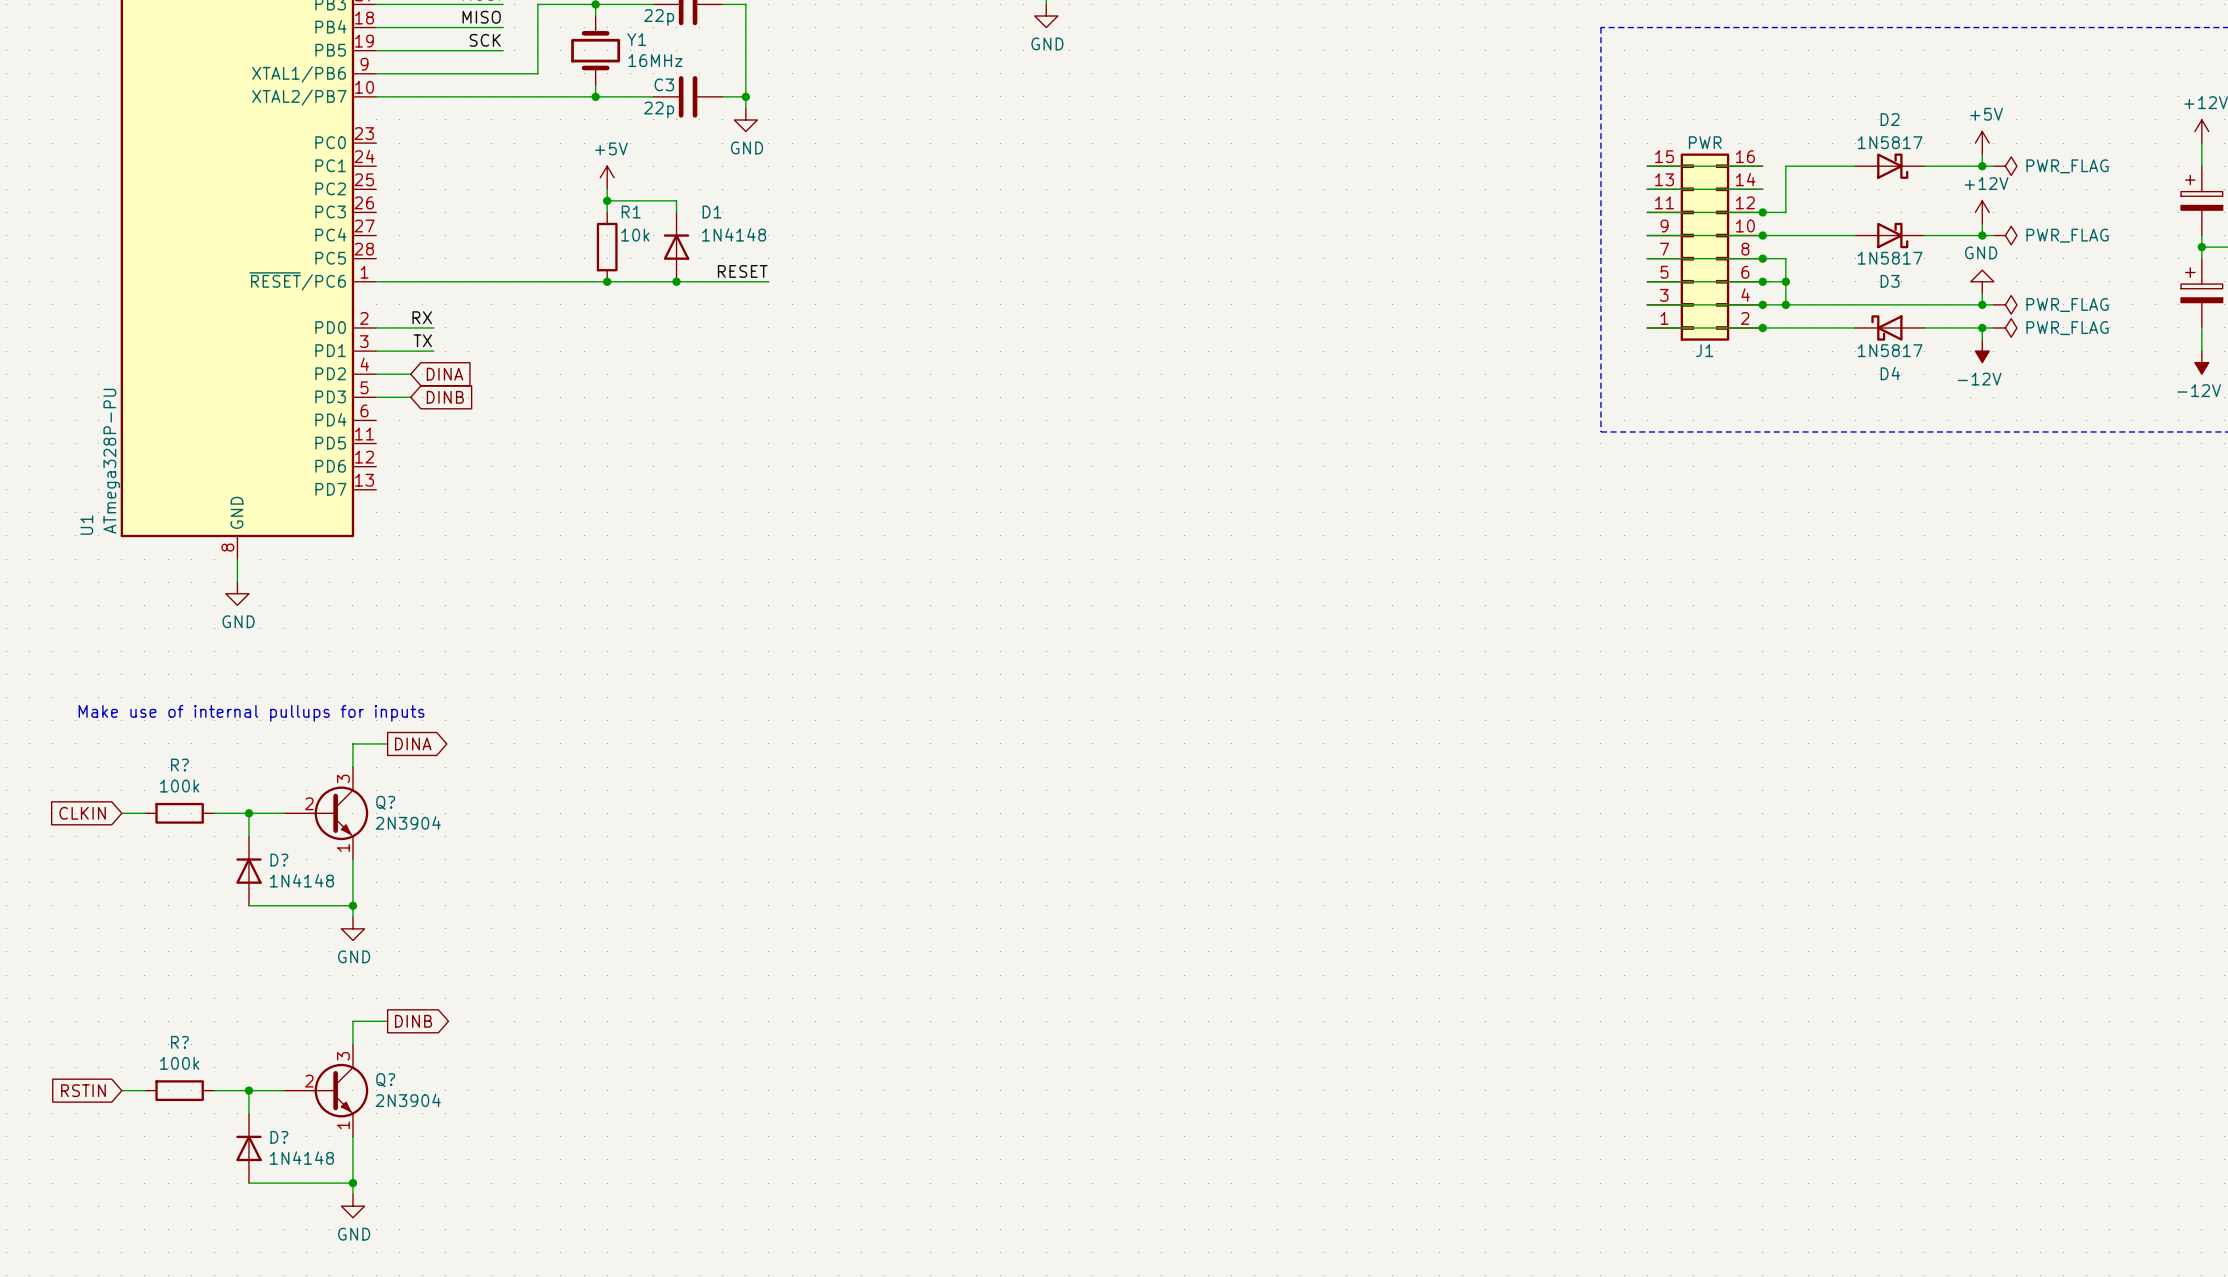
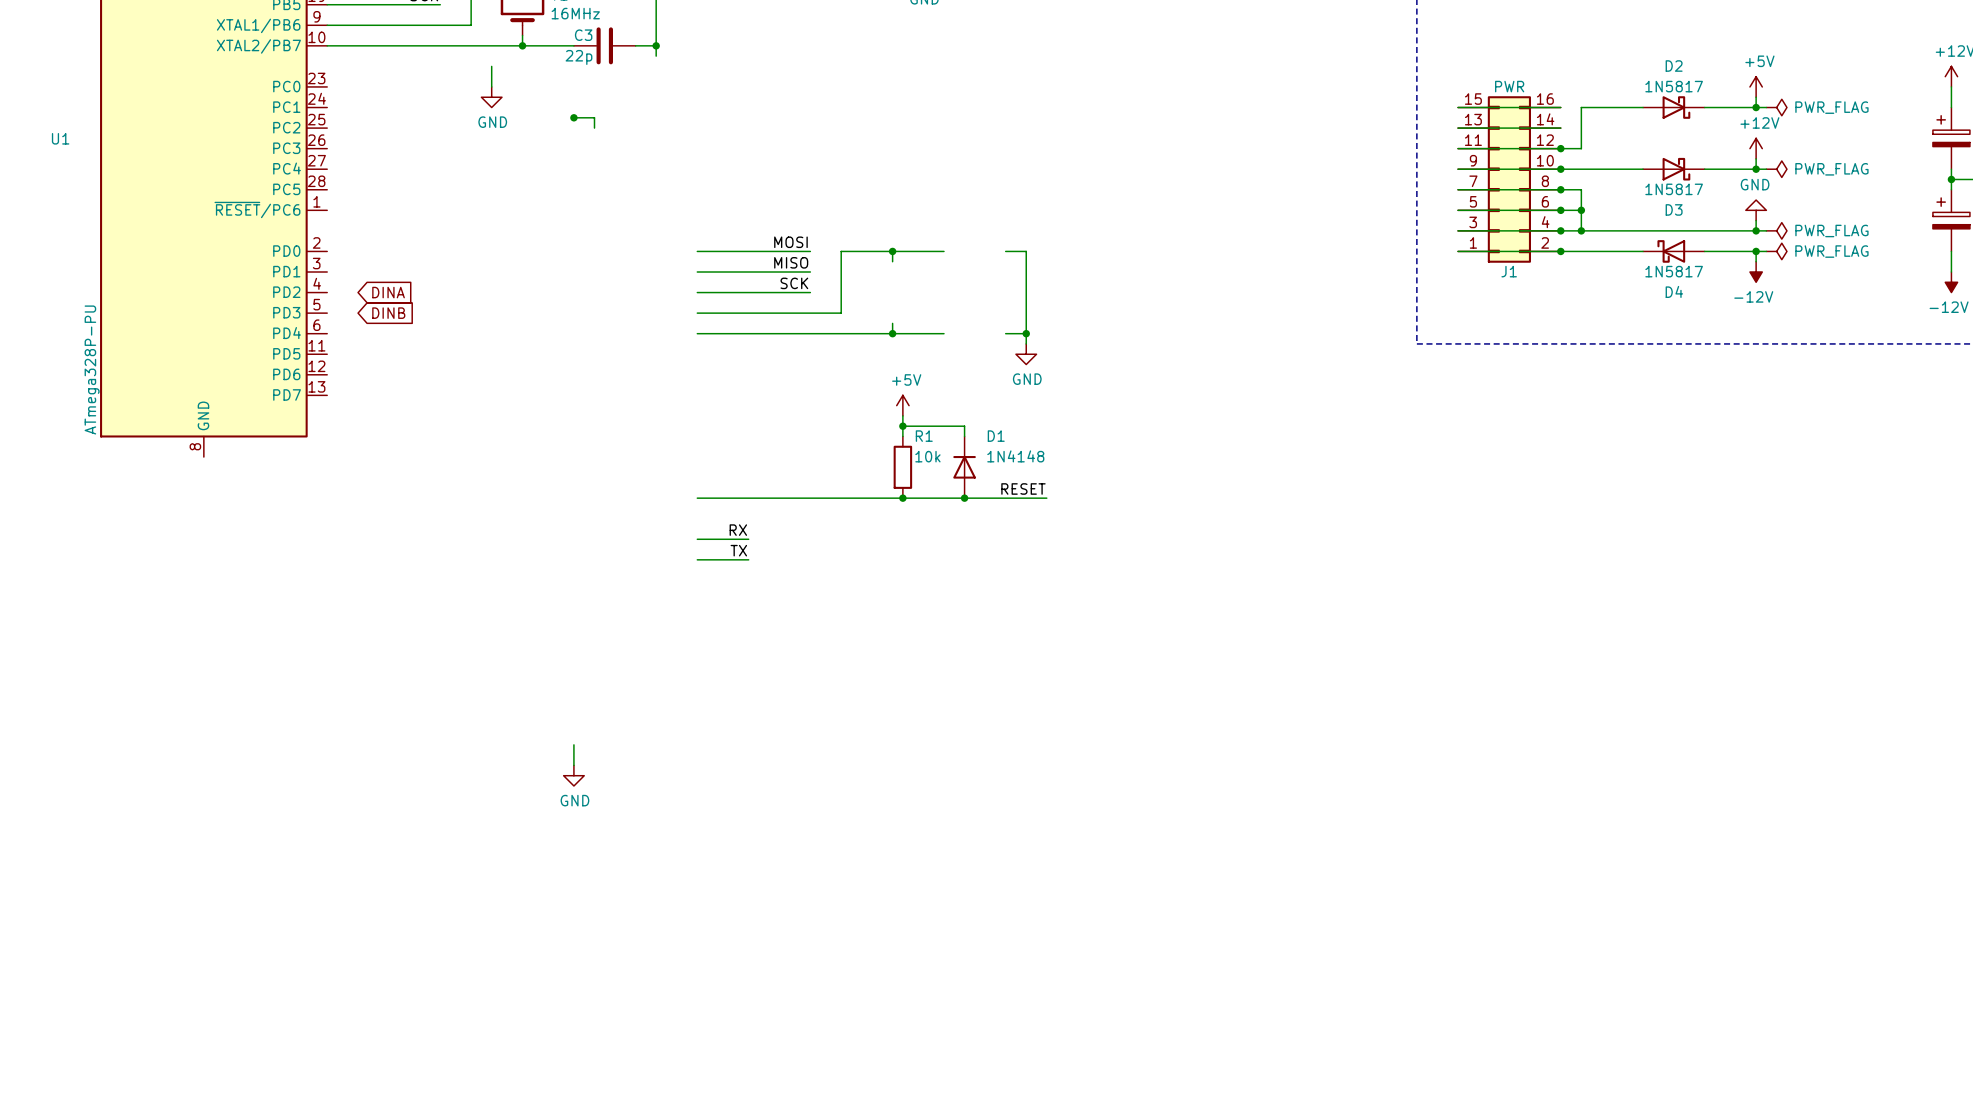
power symbol: GND (745, 119) -> none
power symbol: none -> GND (491, 97)
power symbol: +5V (607, 177) -> none
wire: none -> (573, 117) (594, 117) (594, 128)
wire: (607, 189) (607, 212) -> (491, 66) (491, 86)
wire: (607, 200) (676, 200) (676, 212) -> none
junction position: (607, 200) -> (573, 117)
R1 position: (607, 247) -> (902, 467)
D1 position: (676, 247) -> (964, 467)
label: RESET (742, 271) -> none
wire: (376, 281) (768, 281) -> none
junction: (607, 281) -> none
junction: (676, 281) -> none
label: RX (422, 317) -> none
label: none -> MOSI (790, 242)
wire: (376, 327) (433, 327) -> none
wire: none -> (697, 251) (810, 251)
wire: none -> (892, 251) (892, 261)
junction: none -> (892, 251)
wire: none -> (944, 251) (841, 251) (841, 313) (697, 313)
wire: none -> (1005, 251) (1026, 251) (1026, 343)
label: TX (422, 340) -> none
label: none -> MISO (791, 262)
wire: (376, 351) (433, 351) -> none
wire: none -> (697, 272) (810, 272)
label: none -> SCK (794, 283)
wire: (376, 374) (410, 374) -> none
wire: none -> (697, 292) (810, 292)
wire: (376, 397) (410, 397) -> none
wire: none -> (892, 323) (892, 333)
wire: none -> (697, 333) (944, 333)
junction: none -> (892, 333)
wire: none -> (1005, 333) (1026, 333)
junction: none -> (1026, 333)
power symbol: none -> GND (1026, 354)
power symbol: none -> +5V (902, 405)
wire: none -> (902, 415) (902, 436)
wire: none -> (902, 426) (964, 426) (964, 436)
junction: none -> (902, 426)
U1 name rotation: 0° (86, 525) -> 90° clockwise (60, 138)
U1 name position: U1 (86, 525) -> U1 (60, 138)
wire: (237, 559) (237, 582) -> none
power symbol: GND (237, 593) -> none
label: none -> RESET (1023, 488)
wire: none -> (697, 498) (1046, 498)
junction: none -> (902, 498)
junction: none -> (964, 498)
label: none -> RX (738, 530)
wire: none -> (697, 539) (748, 539)
label: none -> TX (738, 550)
wire: none -> (697, 559) (748, 559)
text: Make use of internal pullups for inputs (251, 713) -> none
wire: (387, 743) (352, 743) (352, 767) -> none
global label: DINA (413, 743) -> none
global label: CLKIN (82, 813) -> none
wire: (121, 813) (144, 813) -> none
R?: 100k (179, 813) -> none
wire: (214, 813) (283, 813) -> none
wire: (248, 813) (248, 836) -> none
junction: (248, 813) -> none
Q?: 2N3904 (325, 813) -> none
wire: (352, 859) (352, 917) -> none
D?: 1N4148 (248, 871) -> none
wire: none -> (573, 744) (573, 765)
wire: (248, 905) (352, 905) -> none
junction: (352, 905) -> none
power symbol: none -> GND (573, 775)
power symbol: GND (352, 928) -> none
wire: (387, 1021) (352, 1021) (352, 1044) -> none
global label: DINB (413, 1021) -> none
global label: RSTIN (83, 1090) -> none
wire: (121, 1090) (144, 1090) -> none
R?: 100k (179, 1090) -> none
wire: (214, 1090) (283, 1090) -> none
wire: (248, 1090) (248, 1113) -> none
junction: (248, 1090) -> none
Q?: 2N3904 (325, 1090) -> none
wire: (352, 1136) (352, 1194) -> none
D?: 1N4148 (248, 1148) -> none
wire: (248, 1183) (352, 1183) -> none
junction: (352, 1183) -> none
power symbol: GND (352, 1206) -> none

